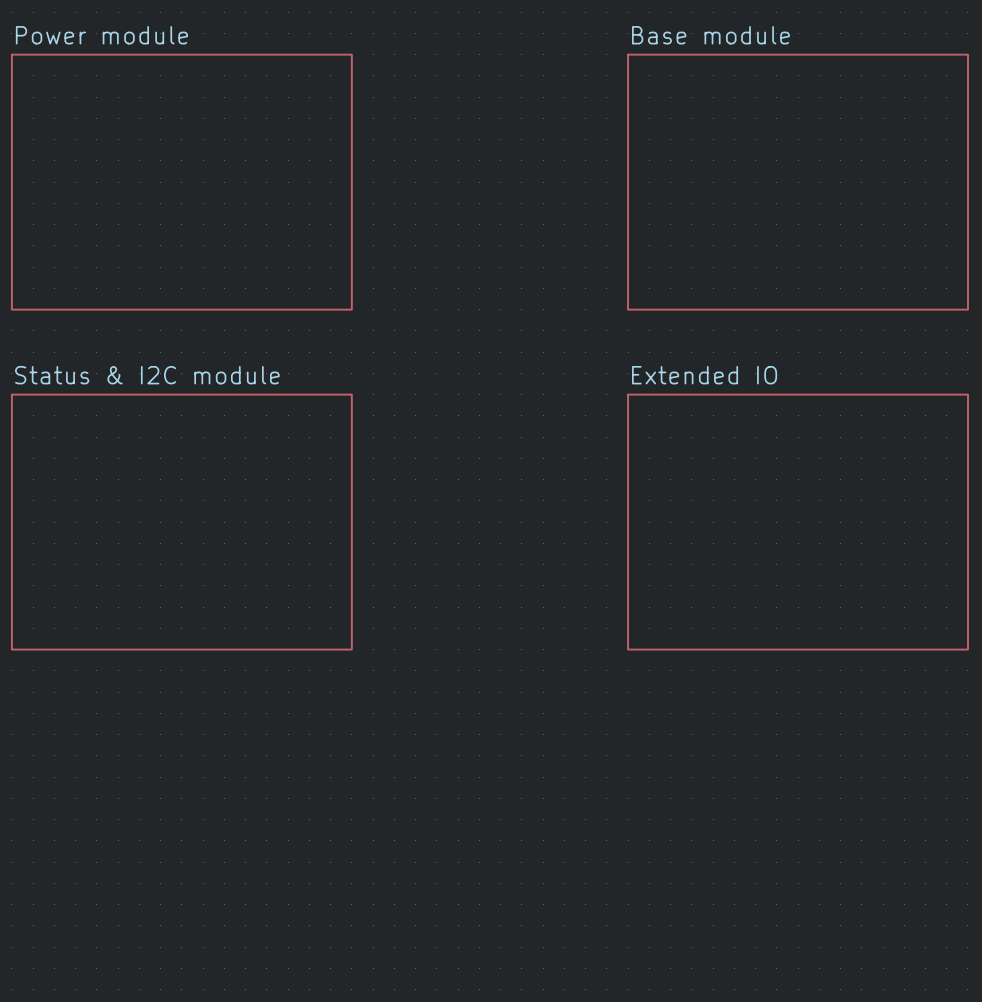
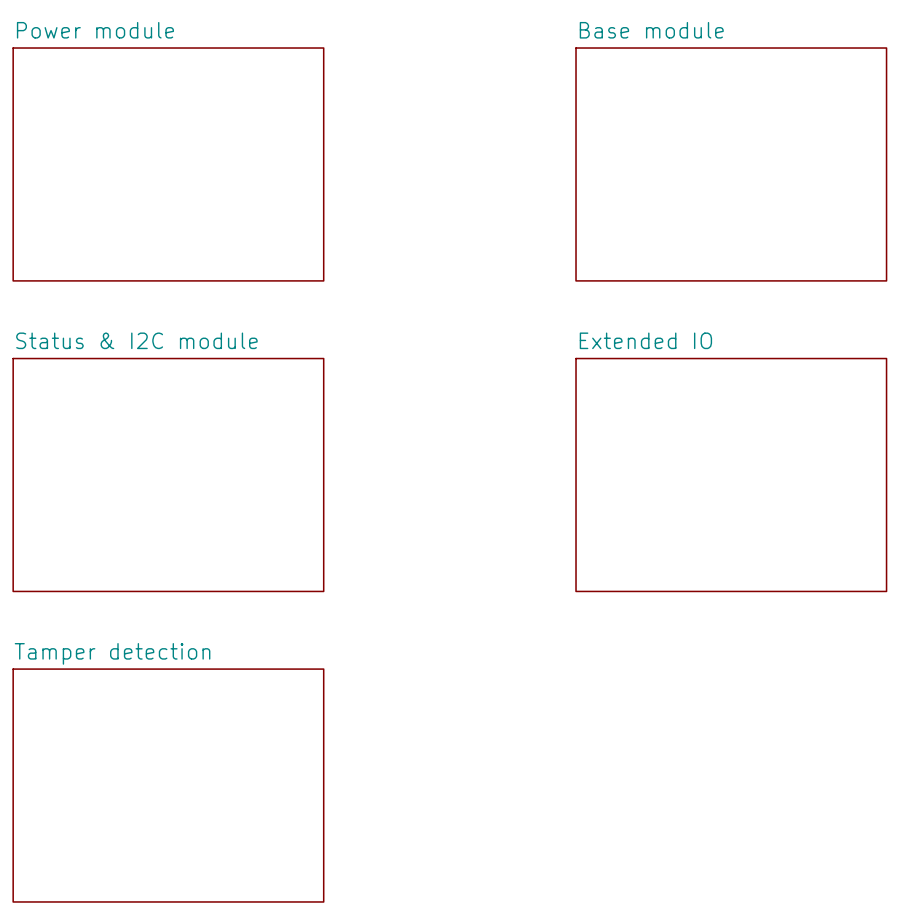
sheet Tamper detection: none -> (168, 785)

